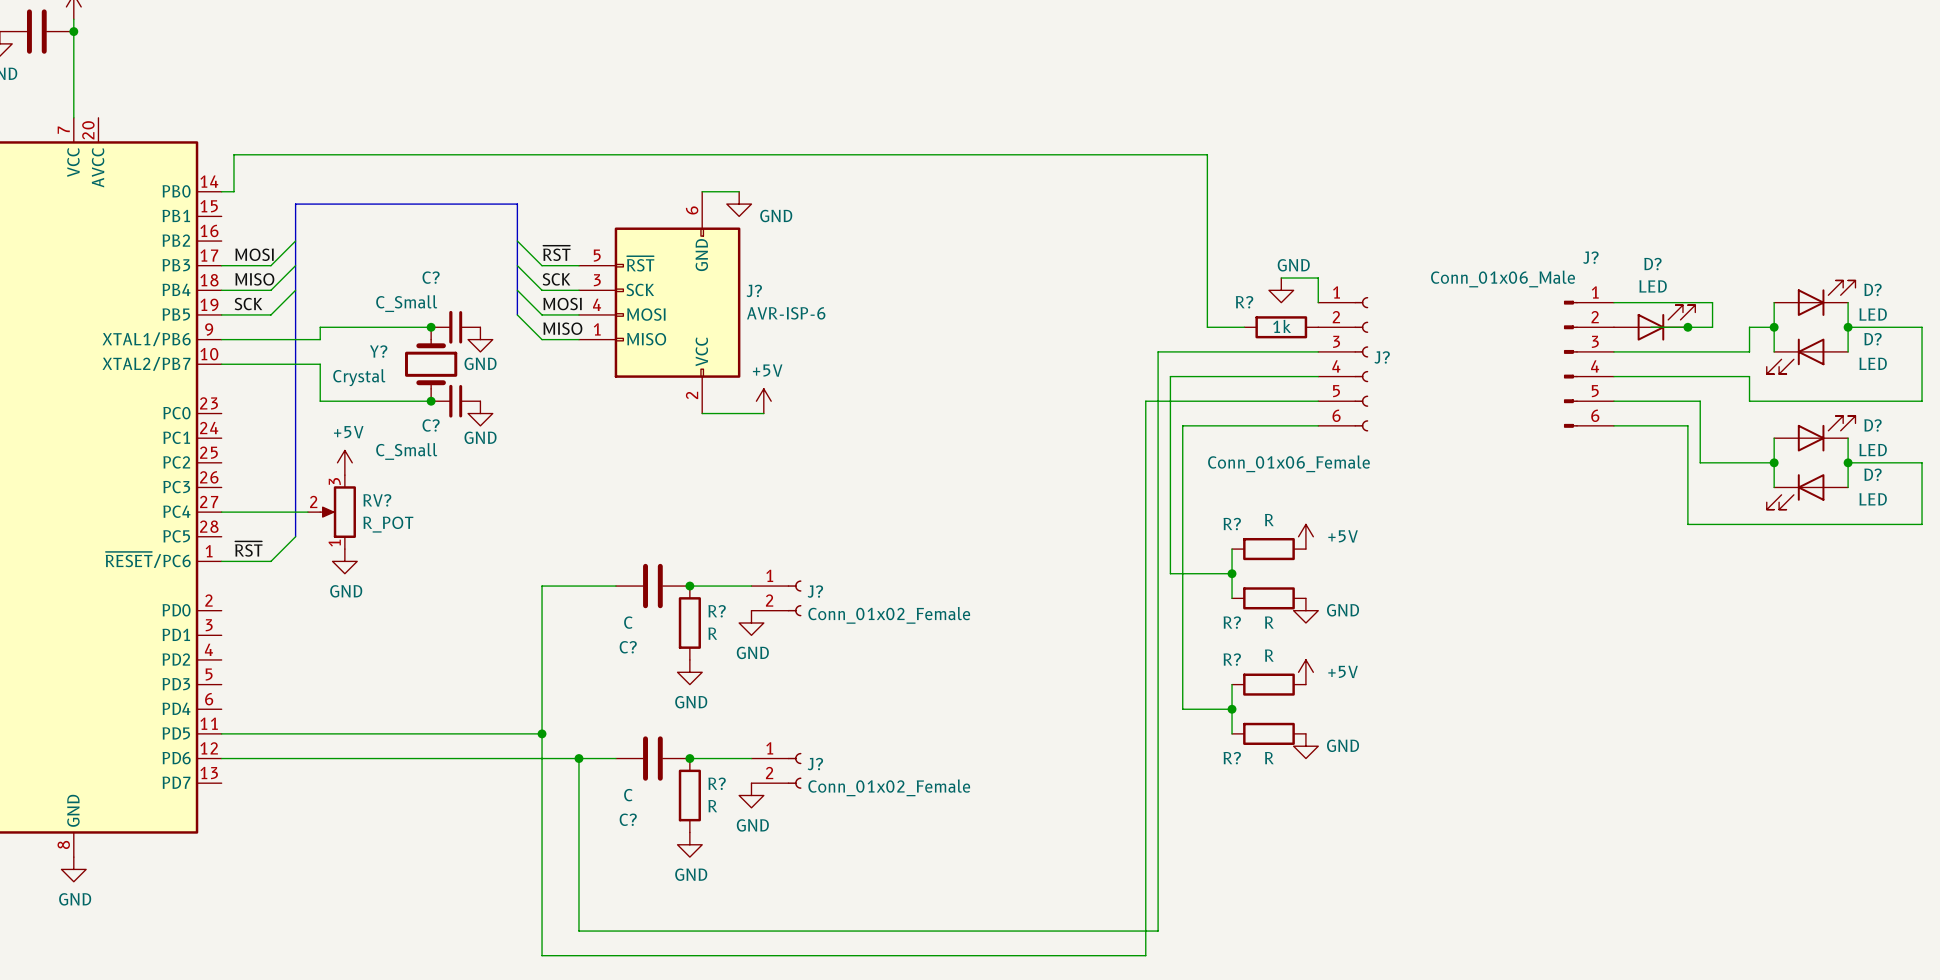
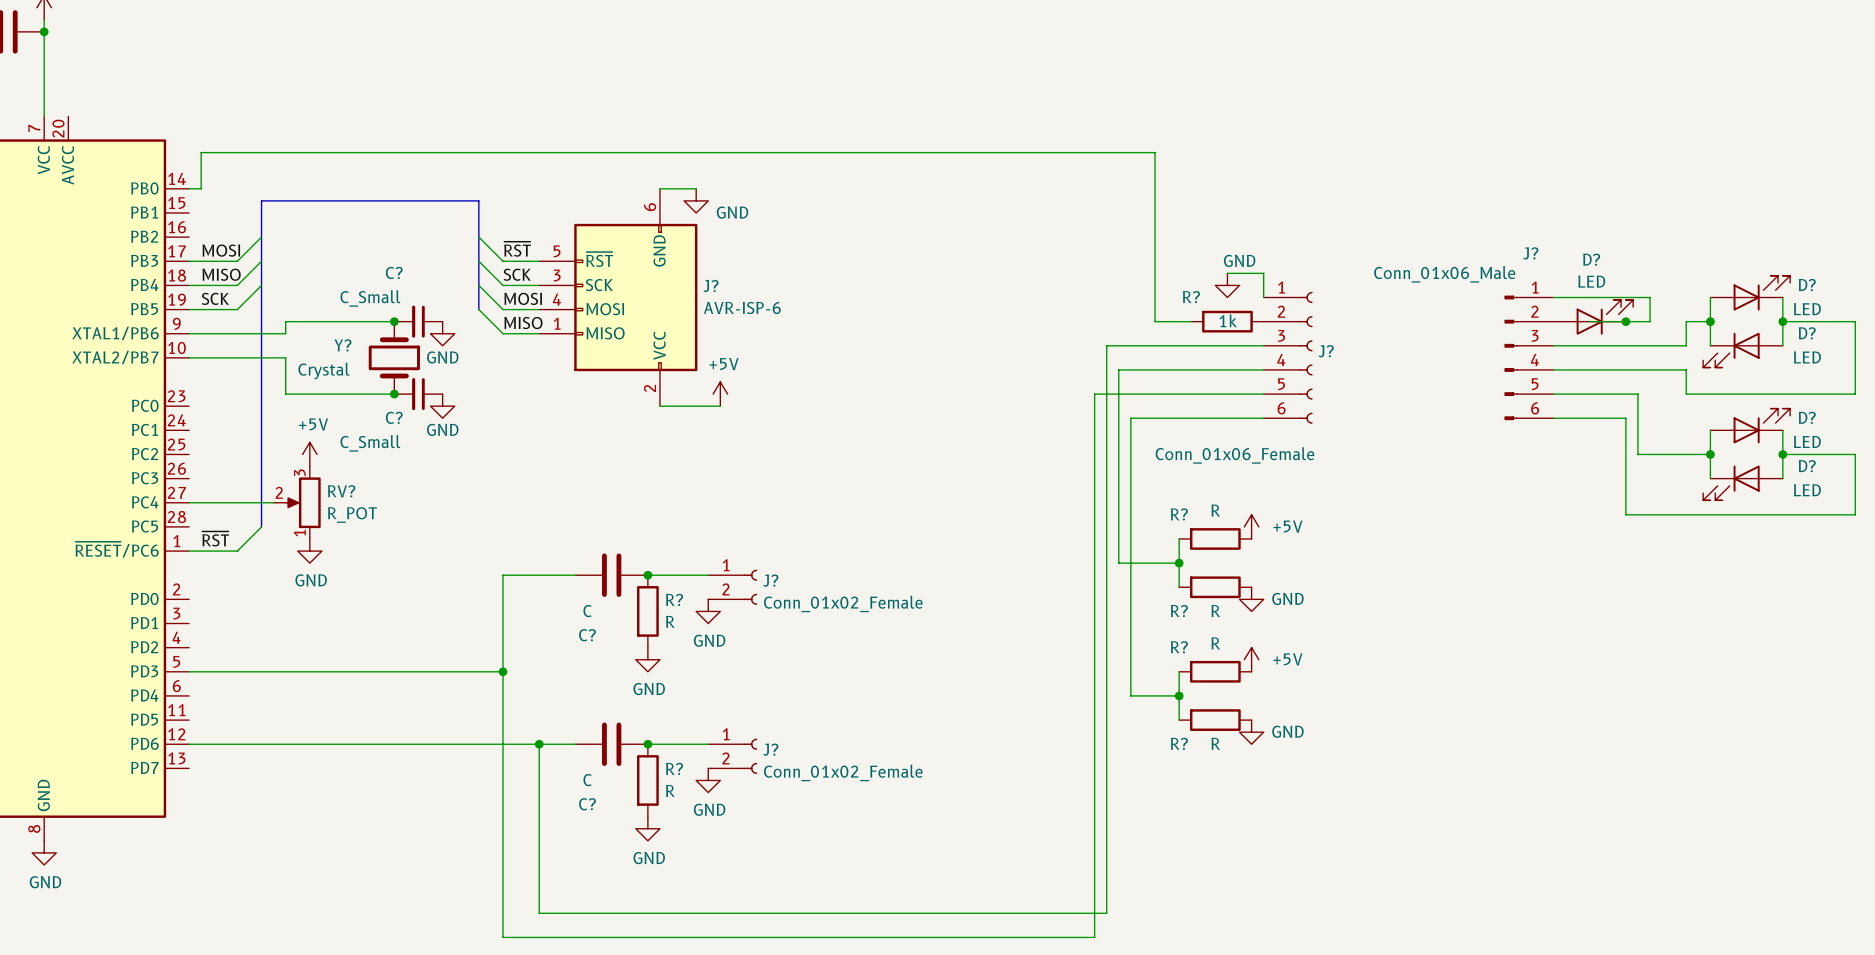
wire: (221, 733) (542, 733) -> (189, 671) (503, 671)
junction position: (542, 733) -> (503, 671)

